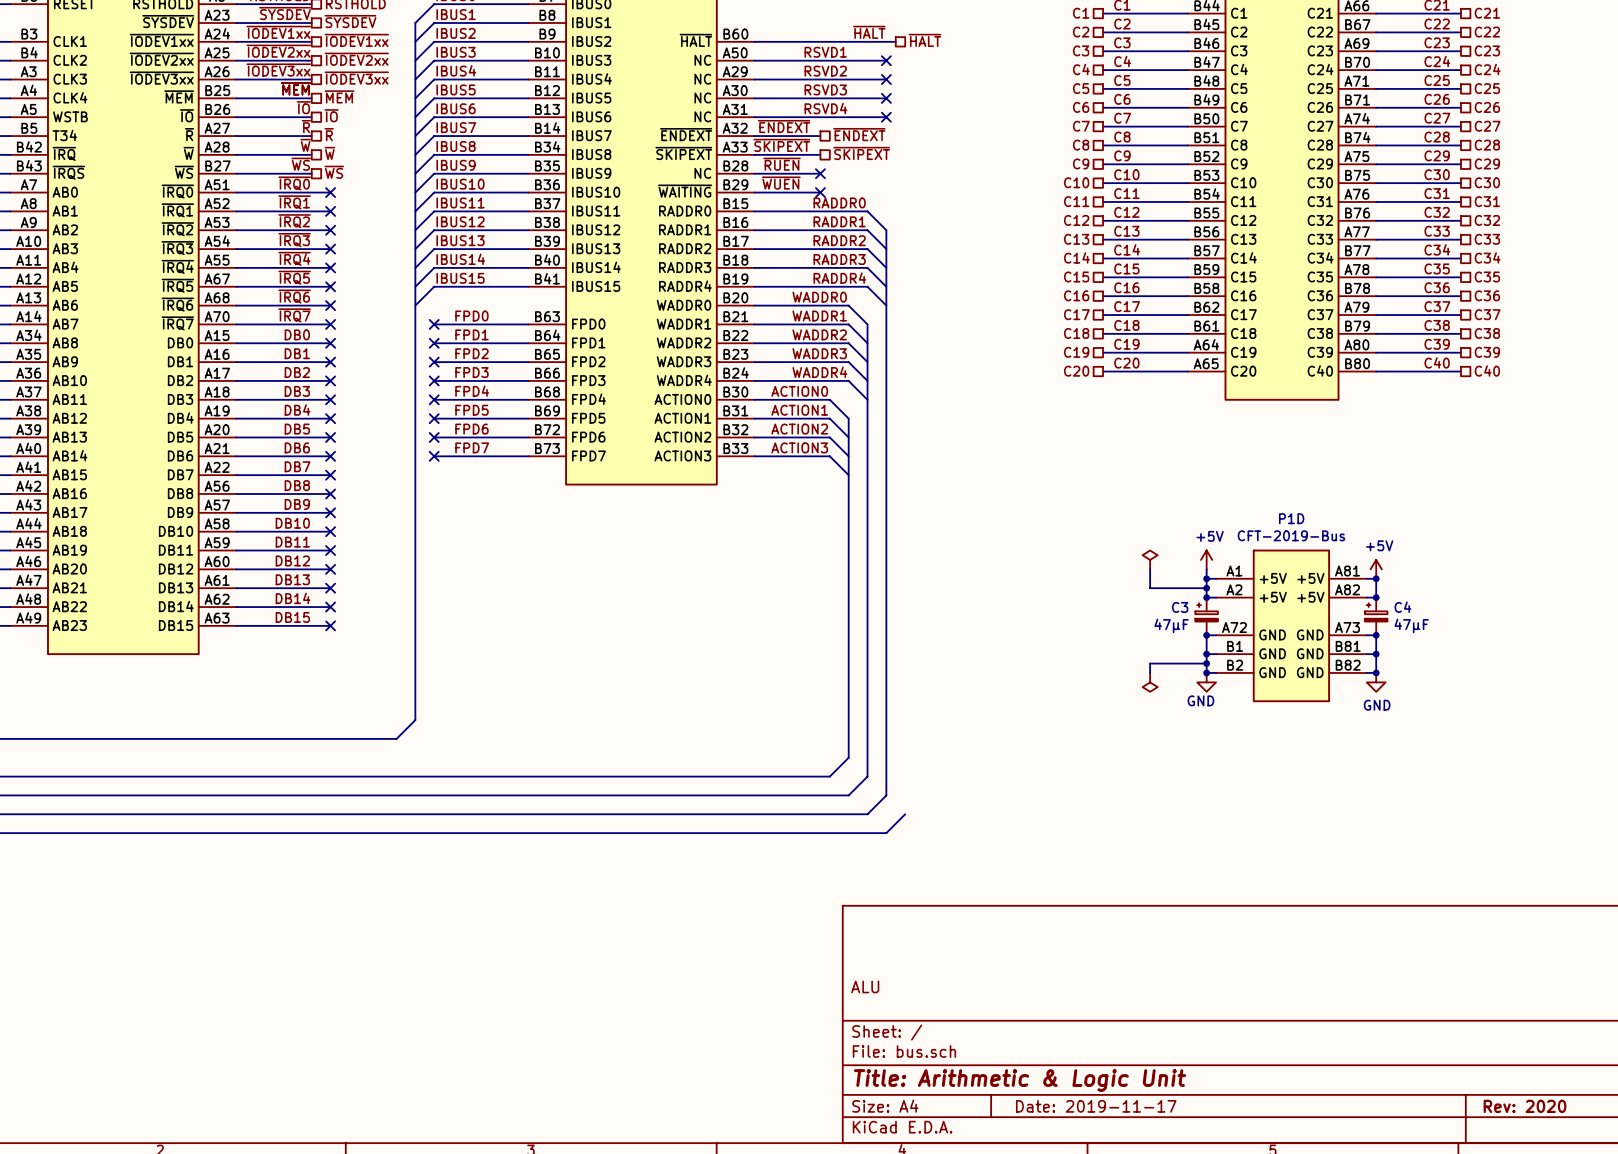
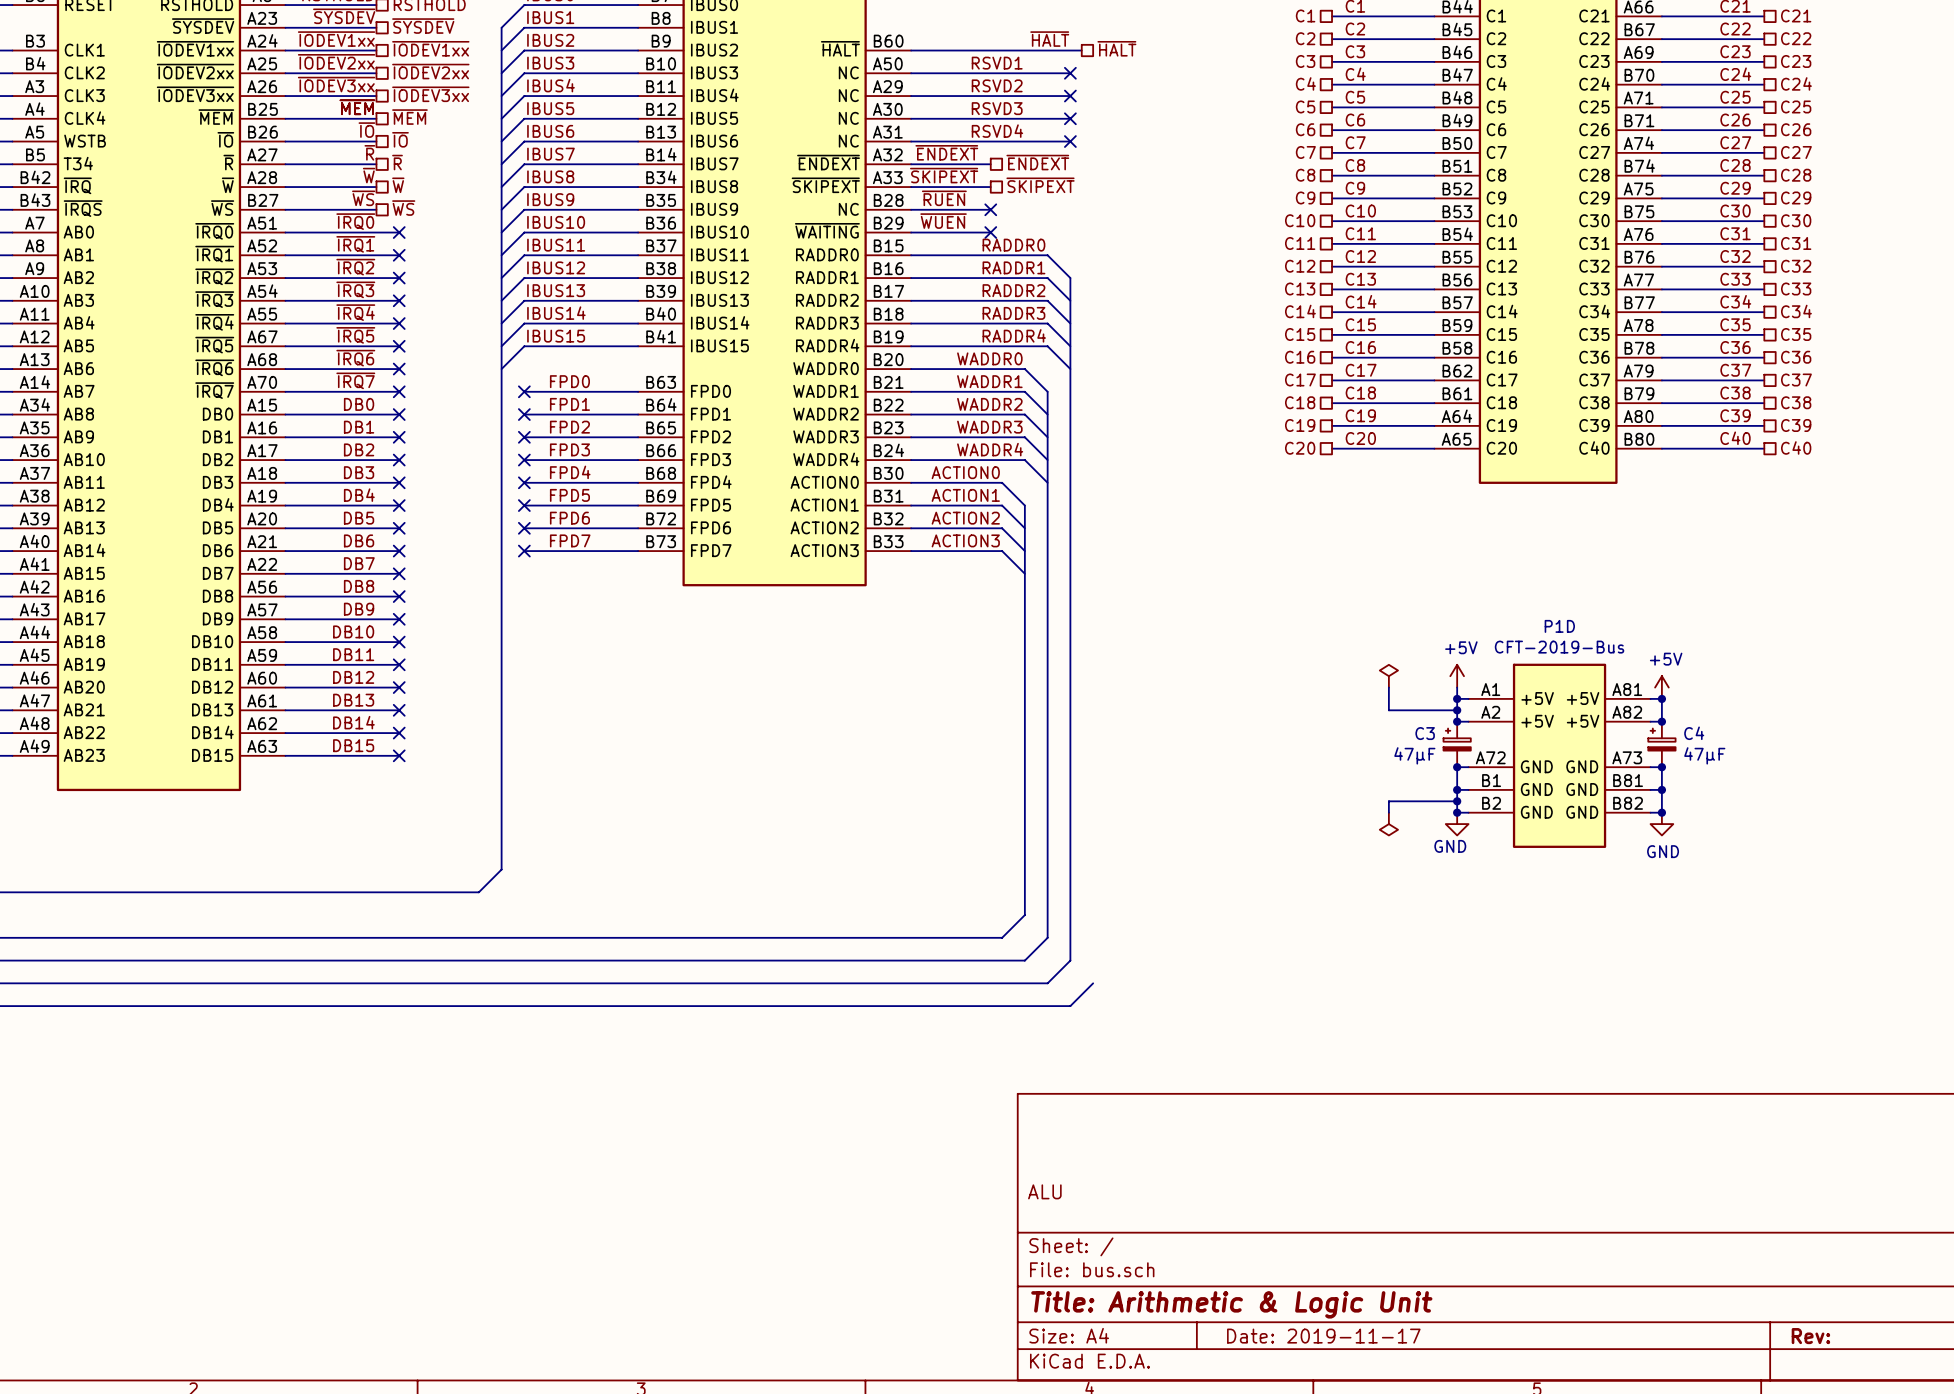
title block: Rev: 2020 (1525, 1106) -> Rev: (1810, 1336)

